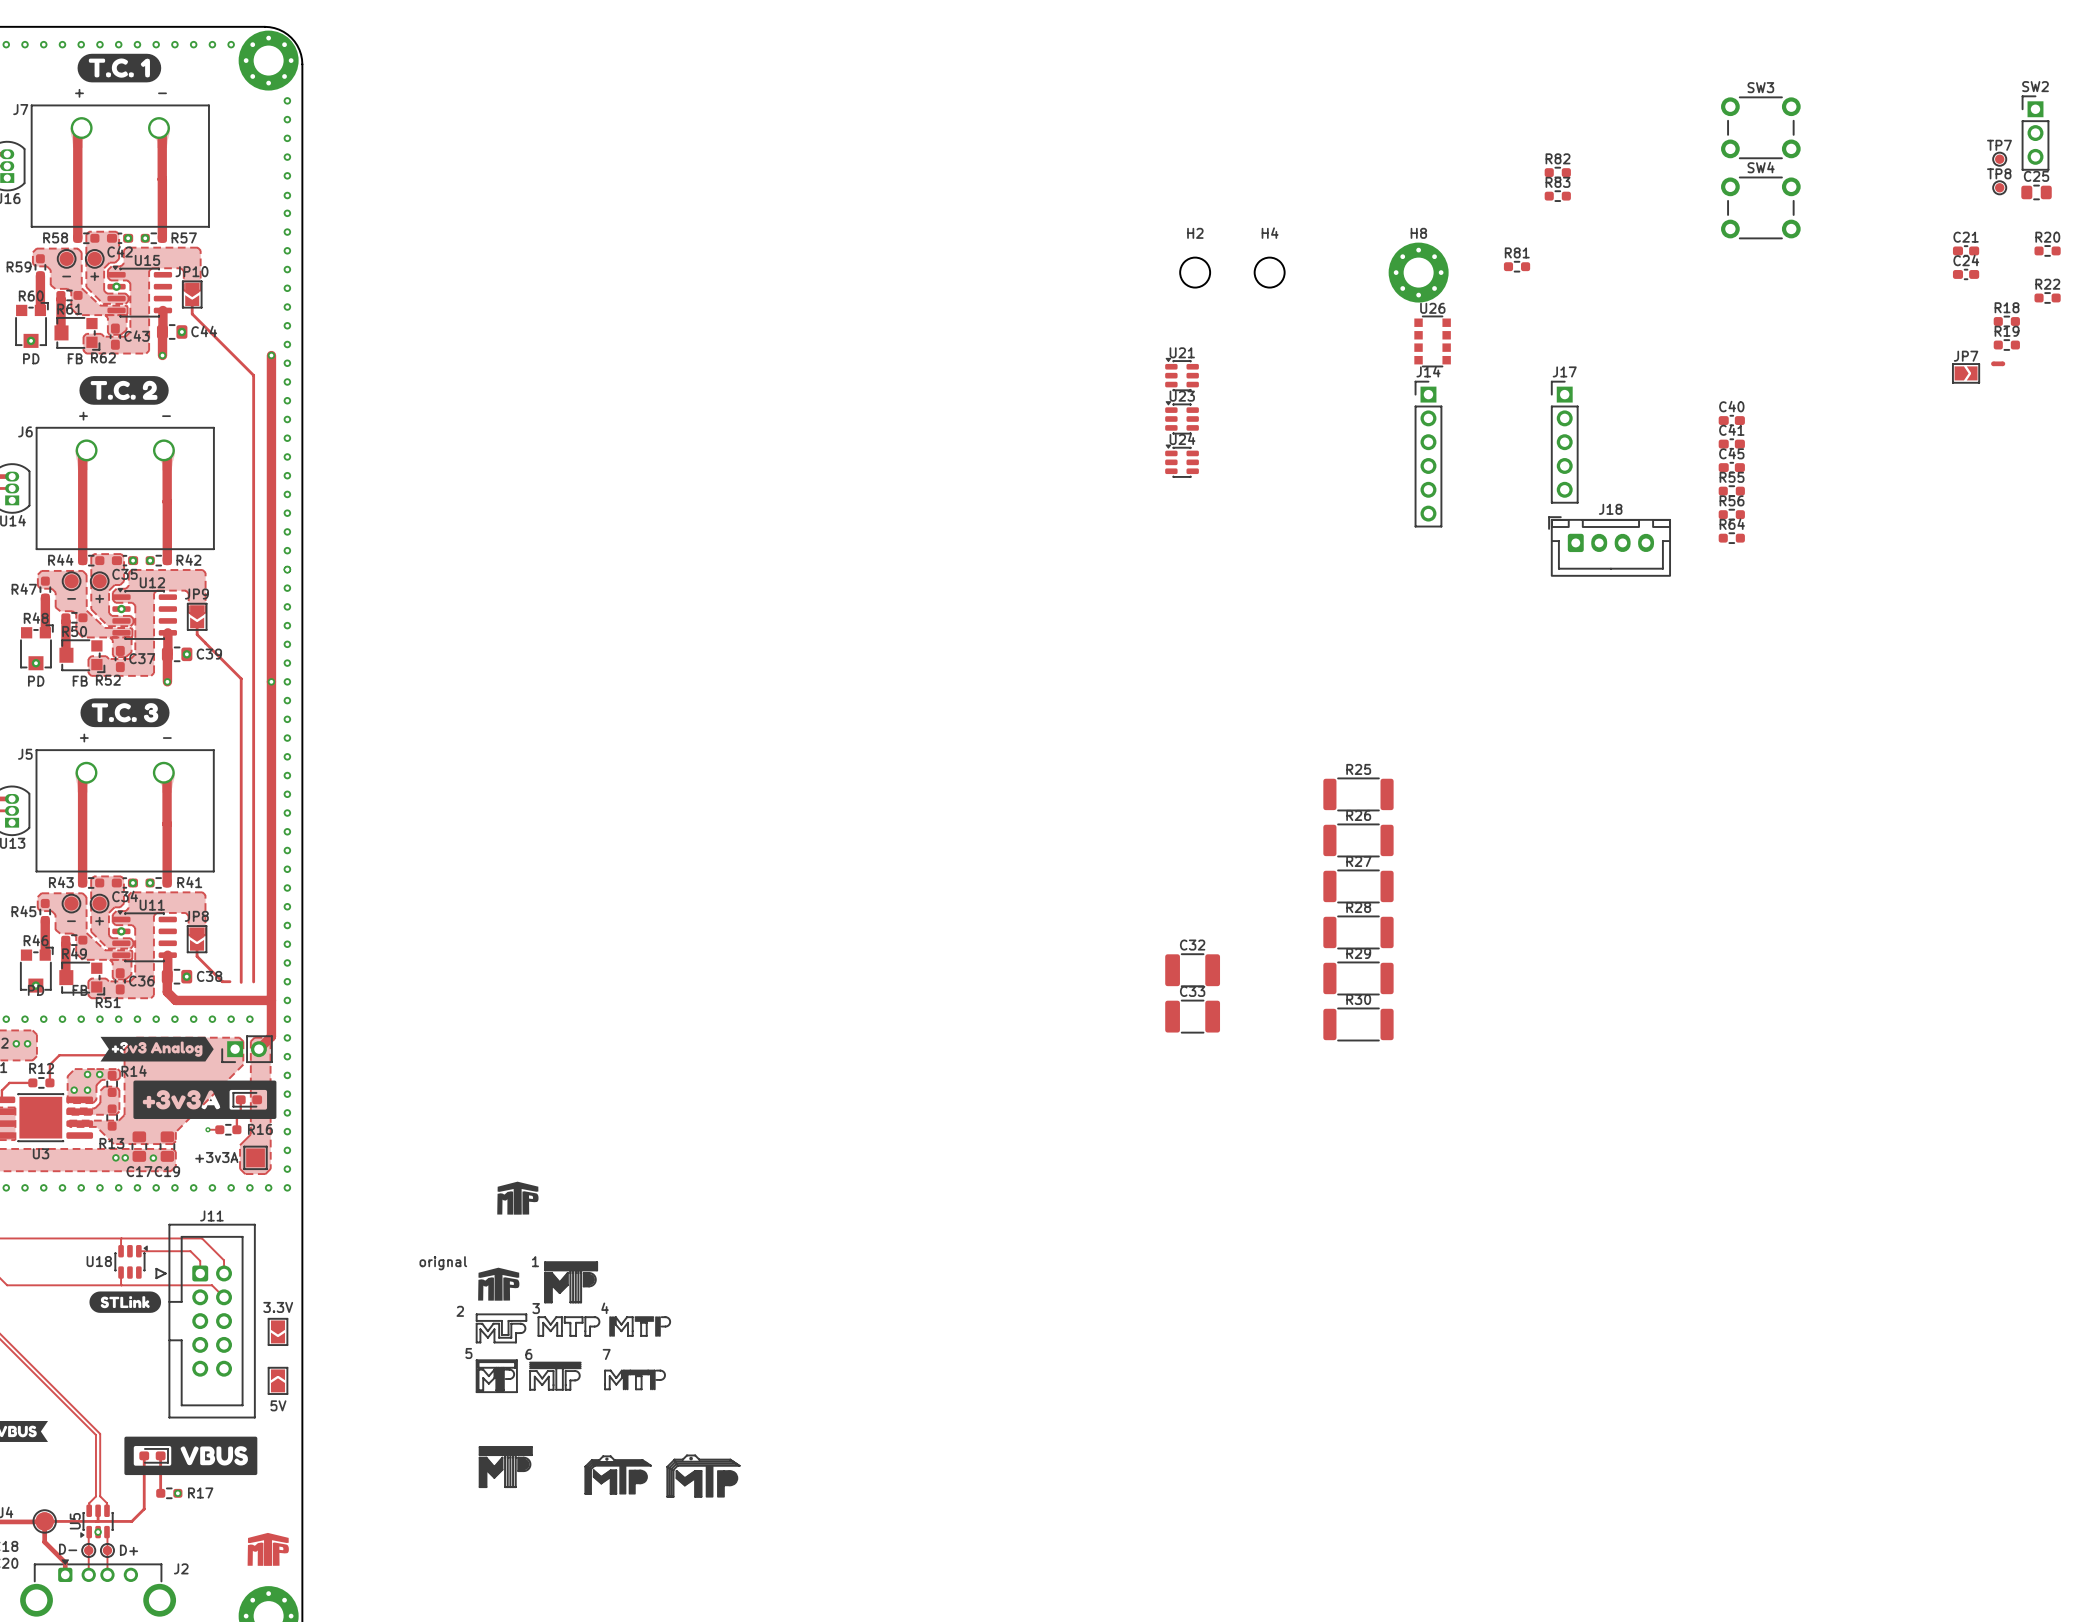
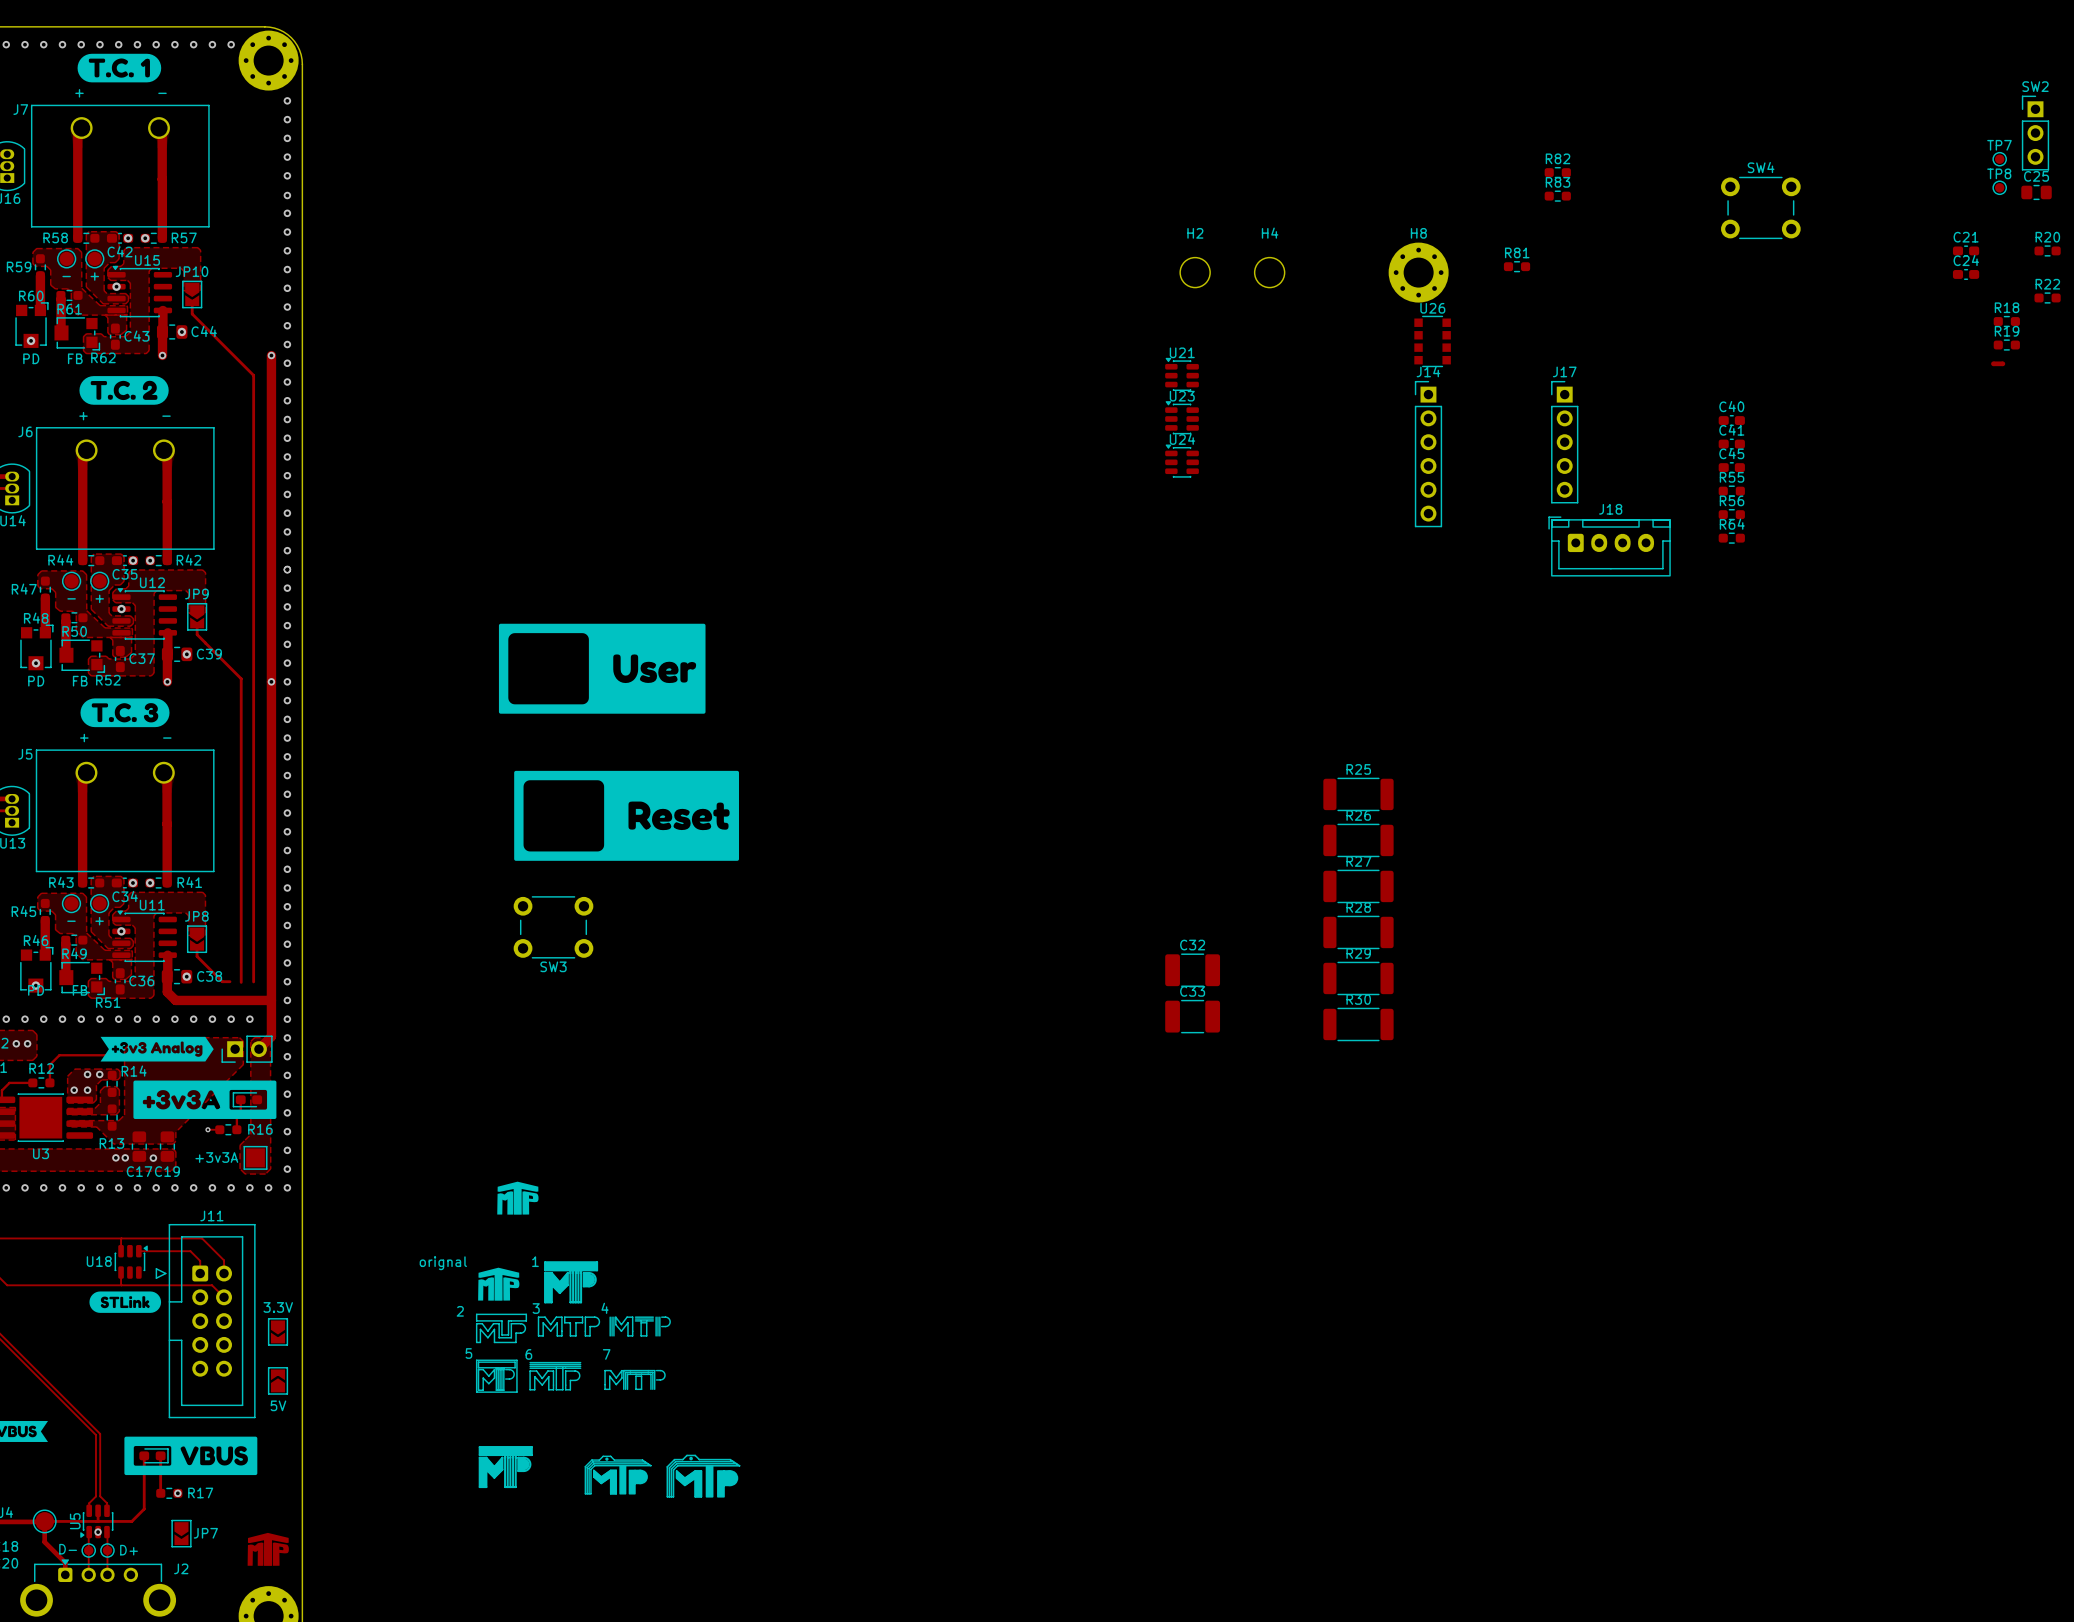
SW3 name position: SW3 (1760, 87) -> SW3 (553, 966)
SW3 position: (1760, 127) -> (553, 927)
JP7 rotation: 0° (1966, 373) -> 90° clockwise (181, 1533)
JP7 position: (1966, 373) -> (181, 1533)
drawing: none -> [498, 623, 706, 714]
drawing: none -> [514, 770, 740, 861]

